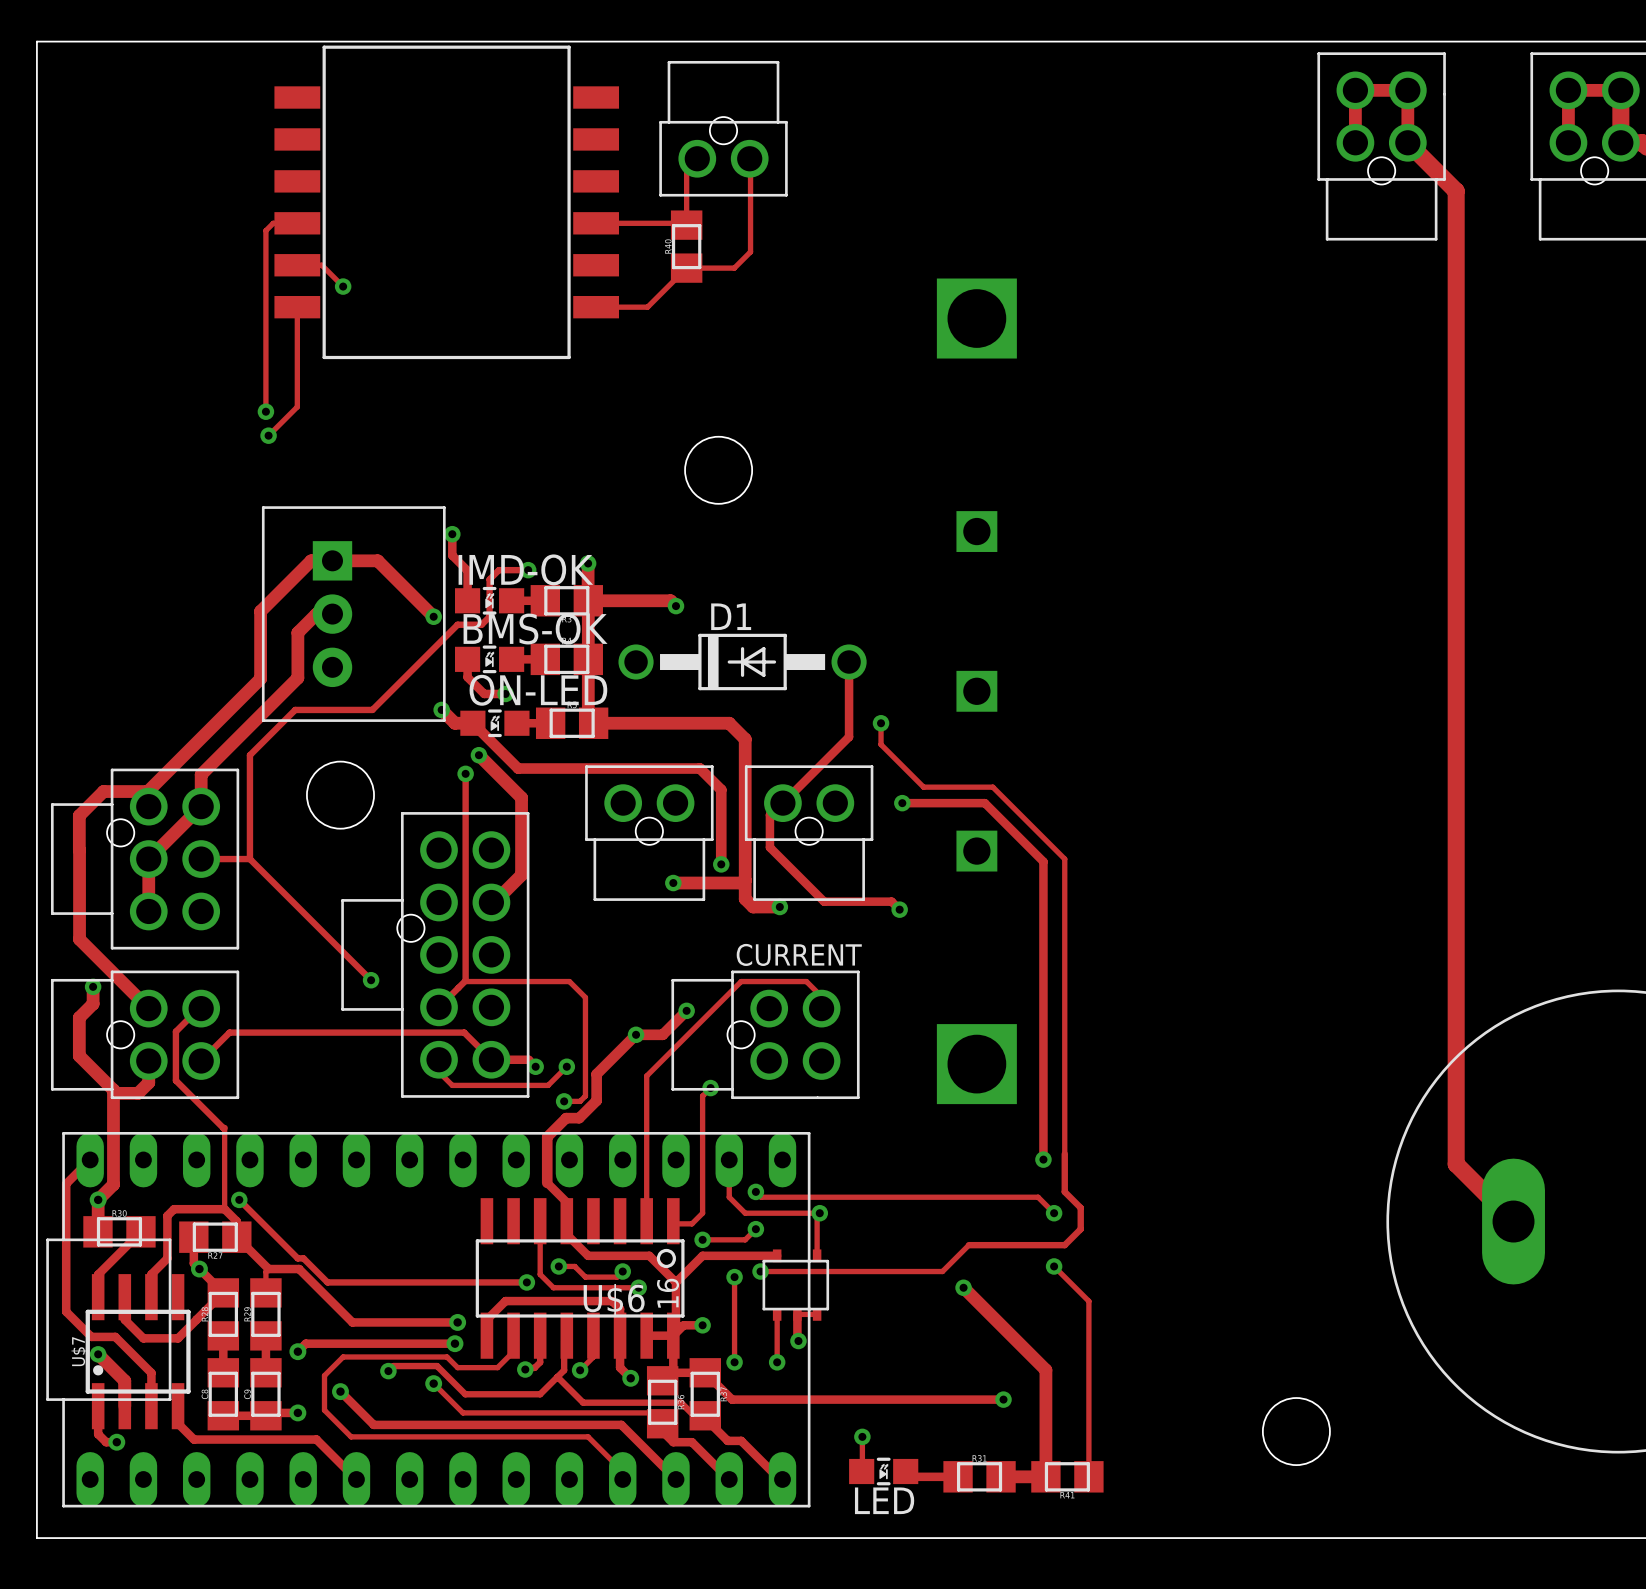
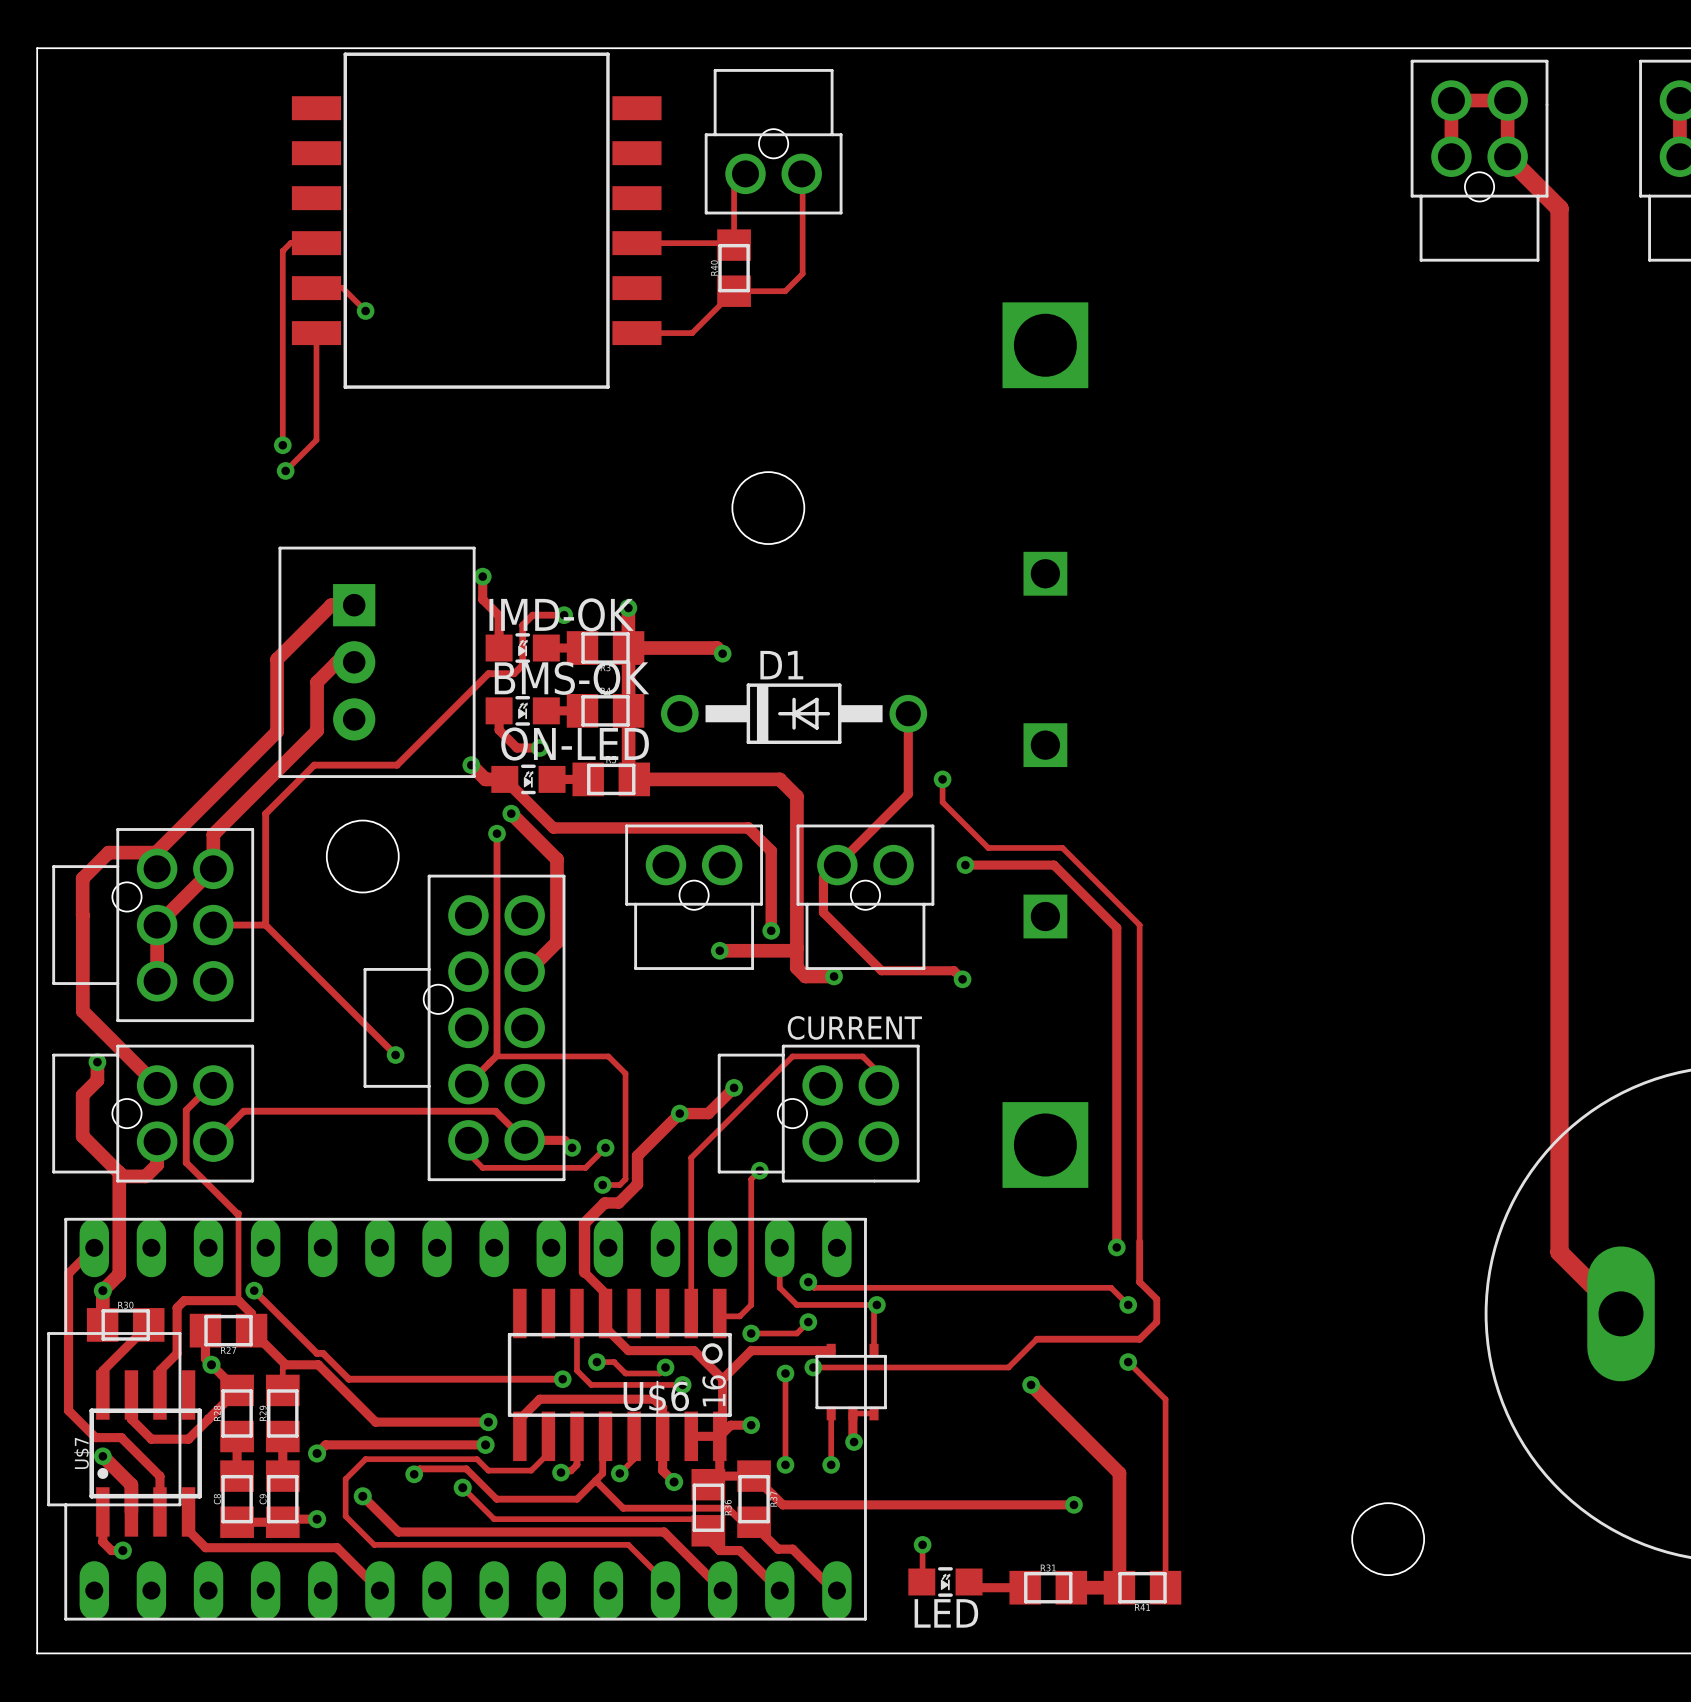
track: (332, 560) (377, 560) (433, 616) -> none
via: (433, 616) -> none

